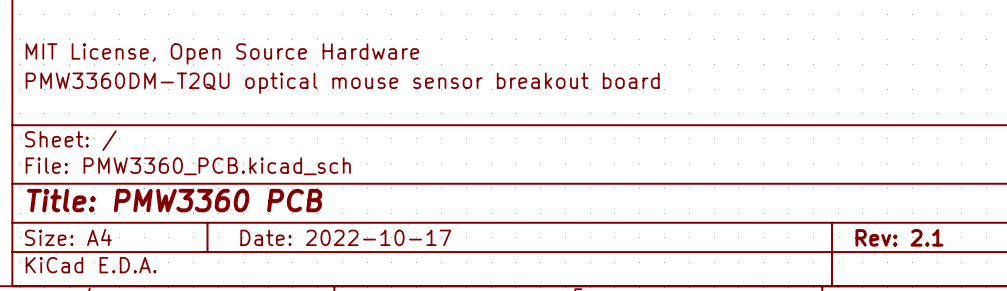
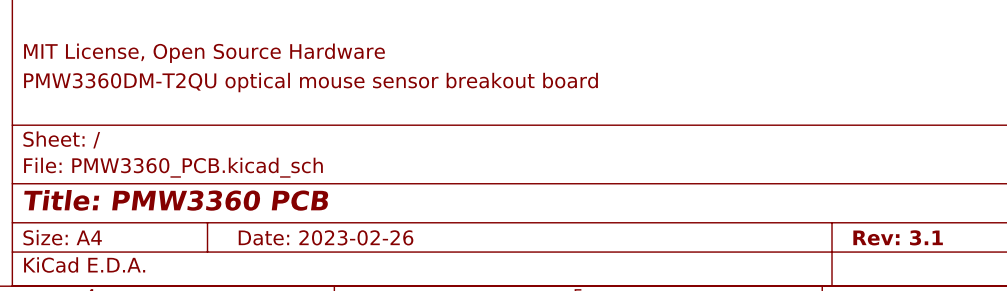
title block: Date: 2022-10-17 (345, 237) -> Date: 2023-02-26 (326, 237)
title block: Rev: 2.1 (899, 237) -> Rev: 3.1 (898, 237)

